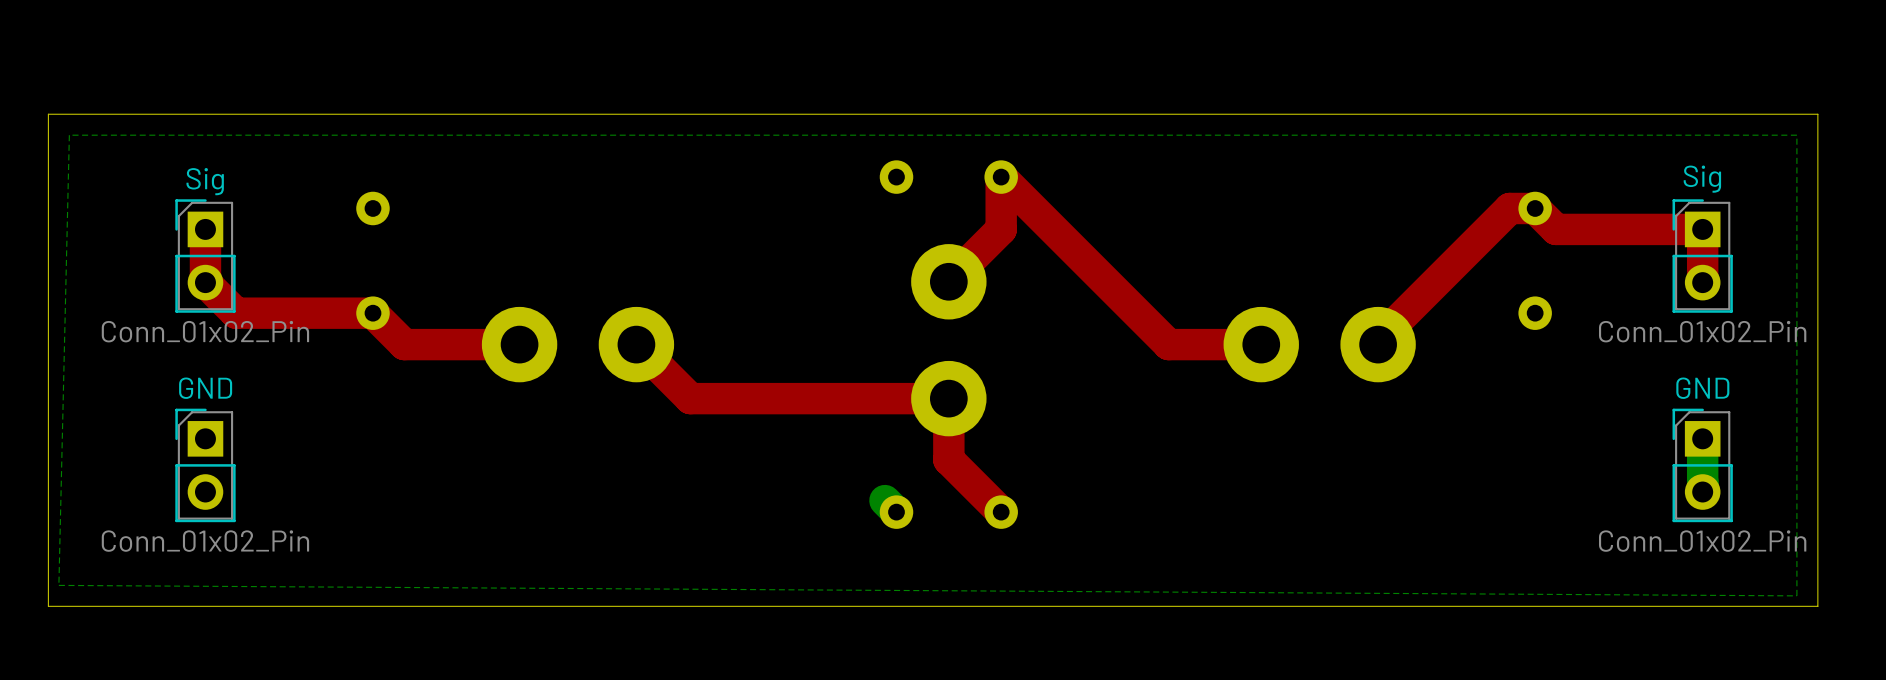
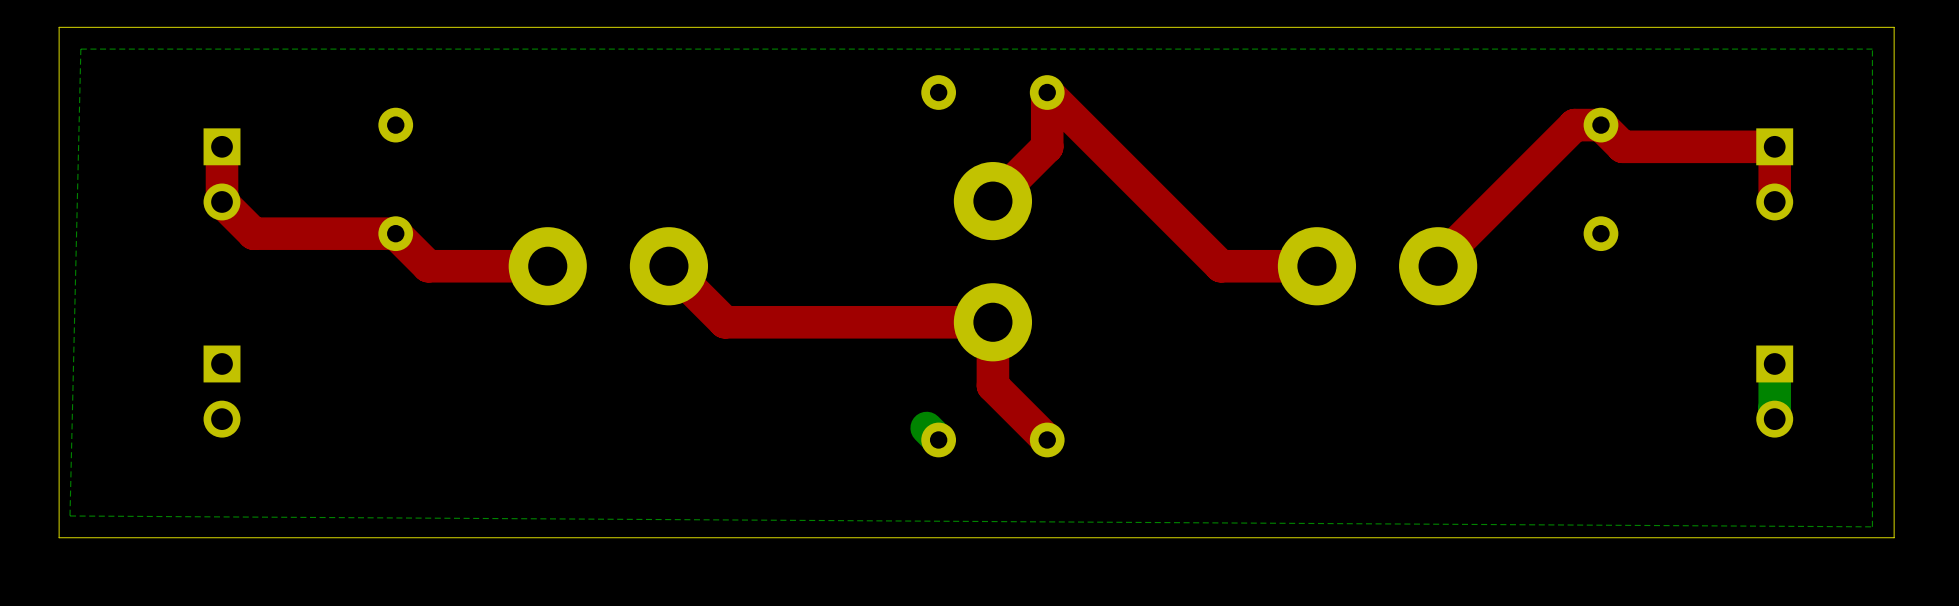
Sig side: bottom (205, 256) -> top (222, 174)
Sig side: bottom (1702, 256) -> top (1774, 174)
GND side: bottom (205, 465) -> top (222, 391)
GND side: bottom (1702, 465) -> top (1774, 391)

